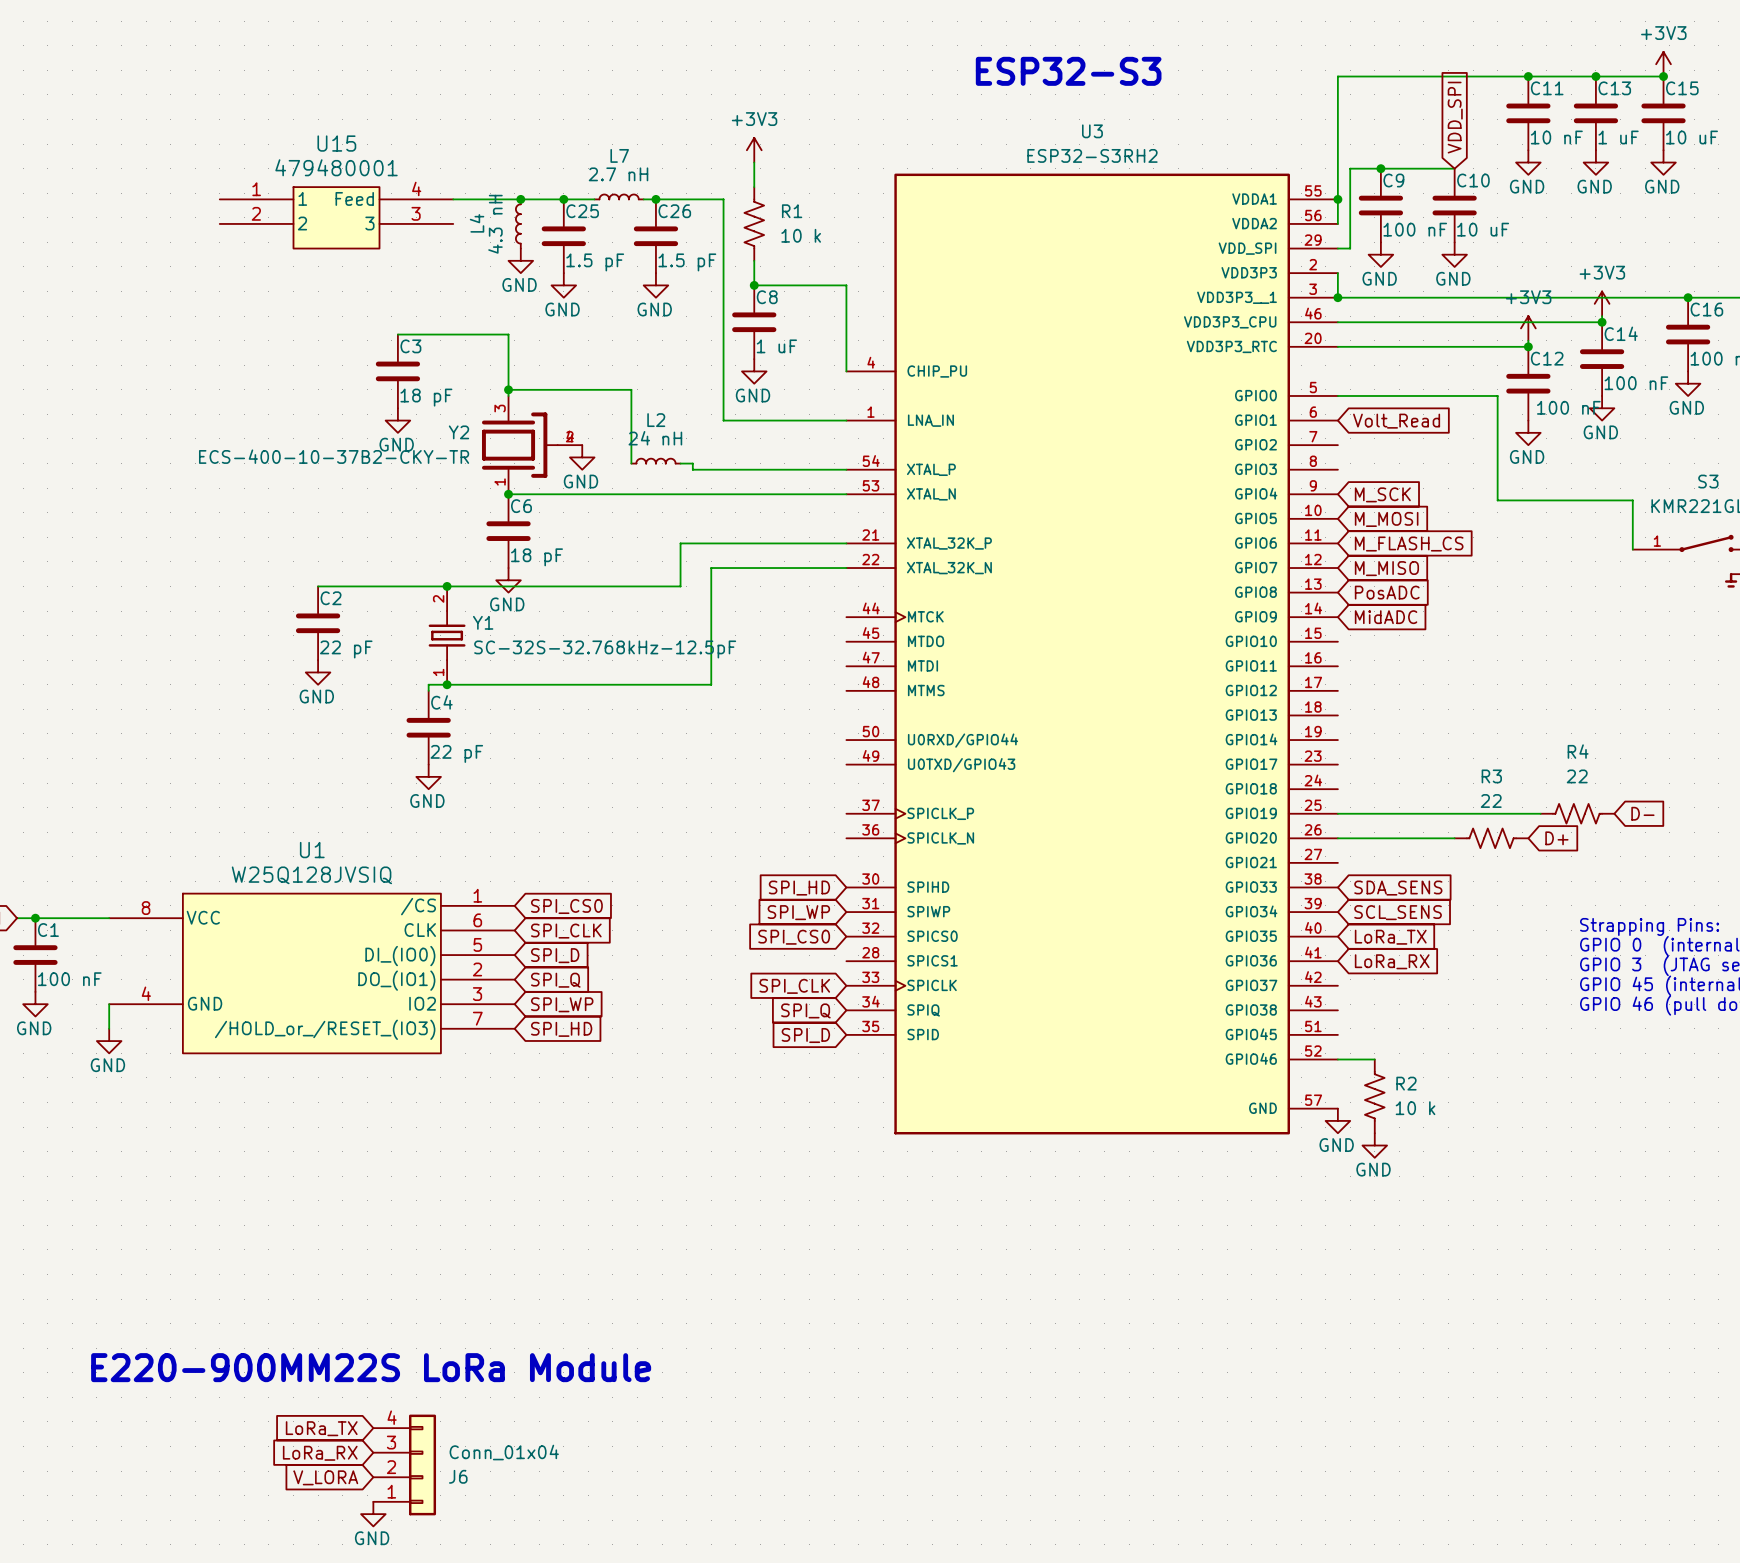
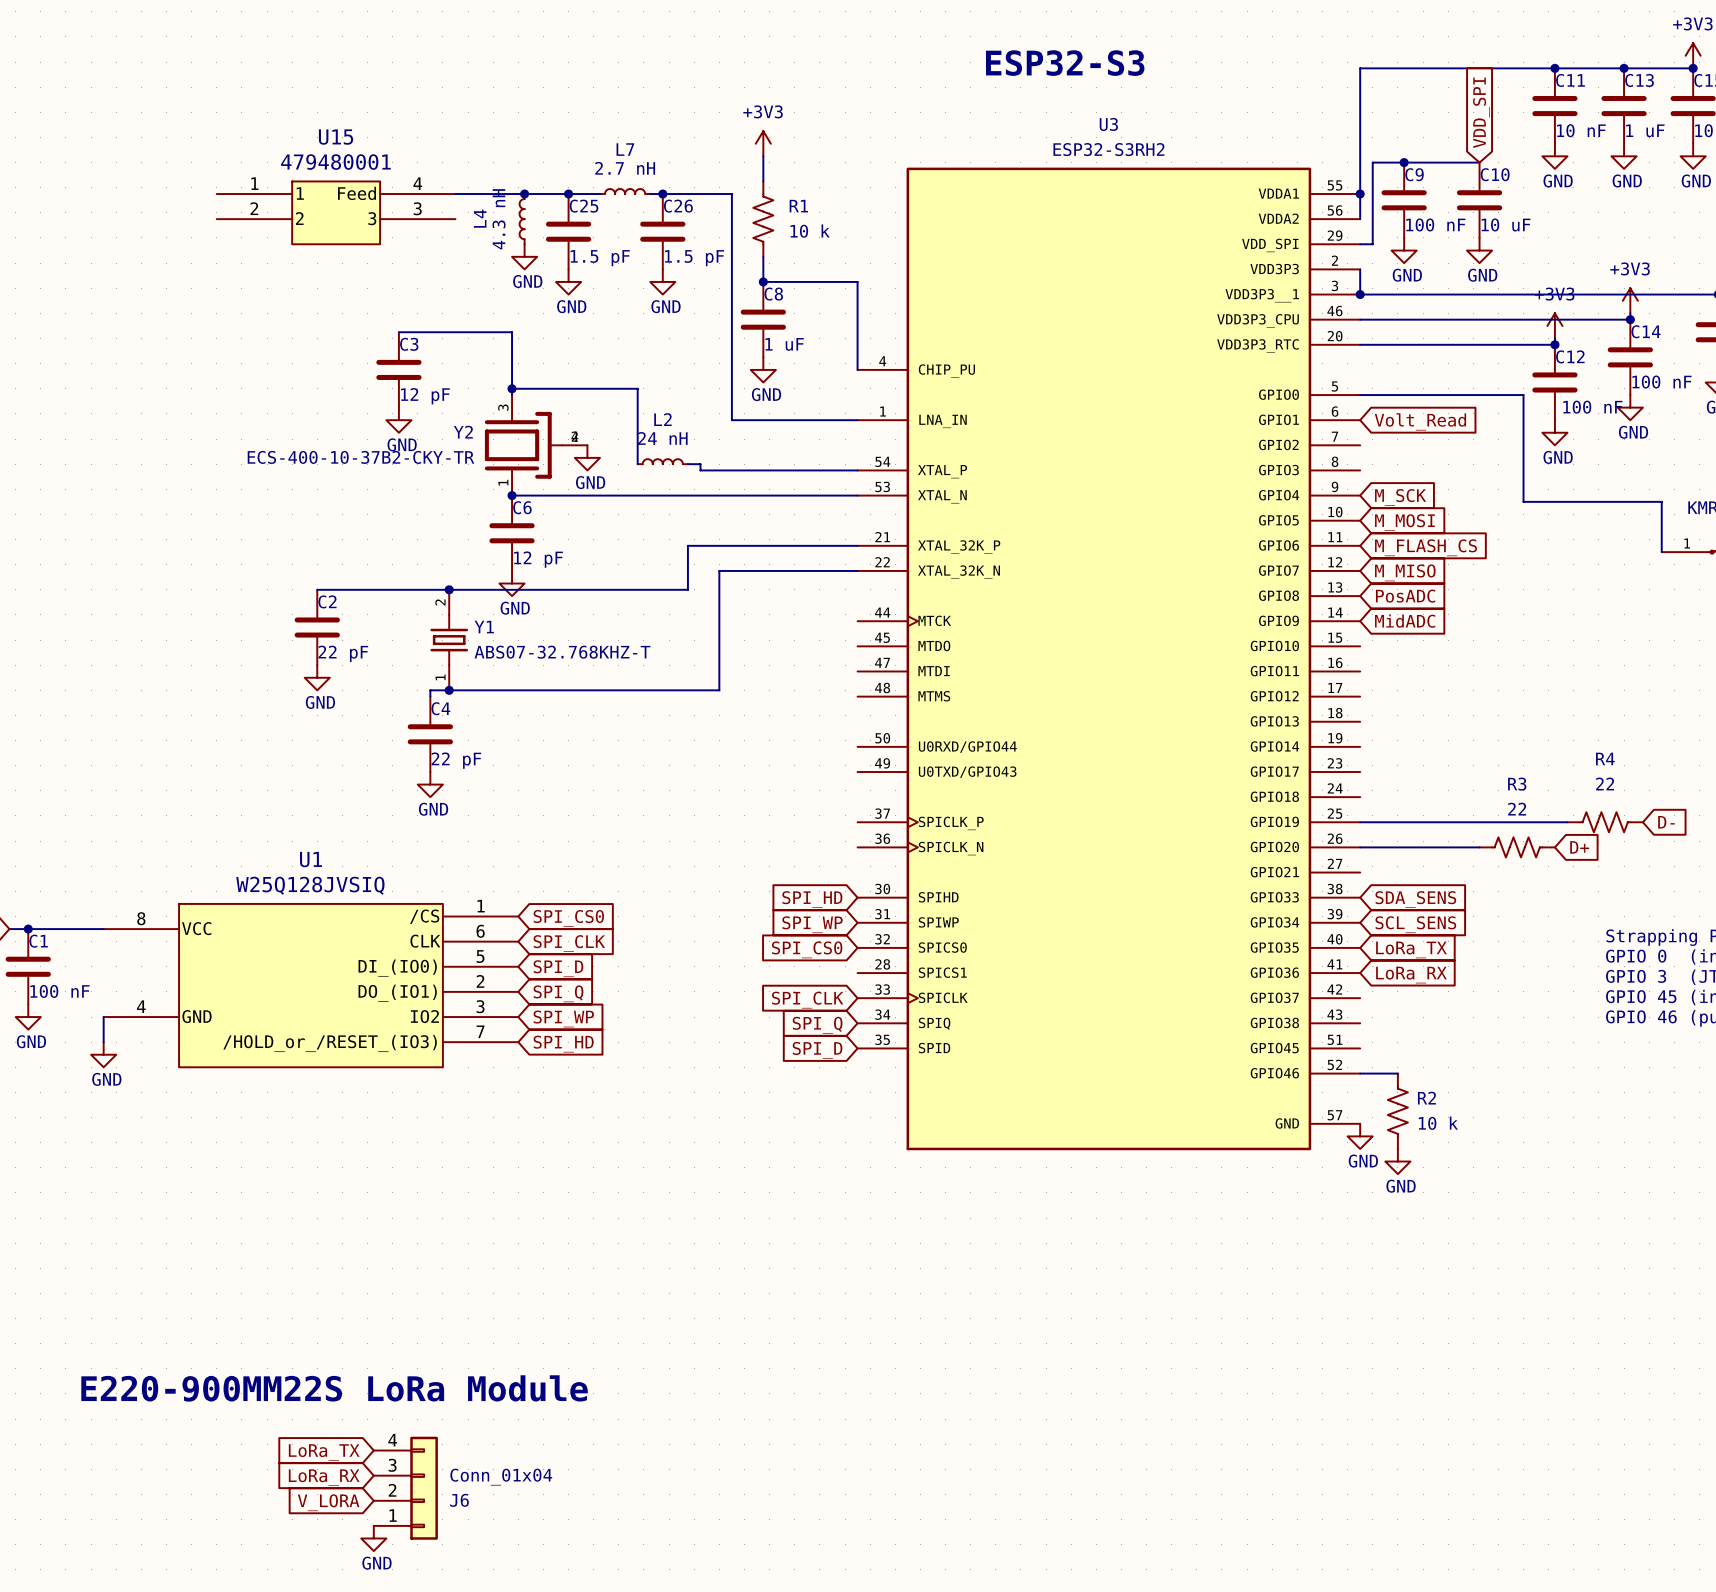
C3 value: 18 pF (426, 397) -> 12 pF (425, 396)
C6 value: 18 pF (536, 557) -> 12 pF (538, 559)
Y1 value: SC-32S-32.768kHz-12.5pF (605, 649) -> ABS07-32.768KHZ-T (562, 652)

